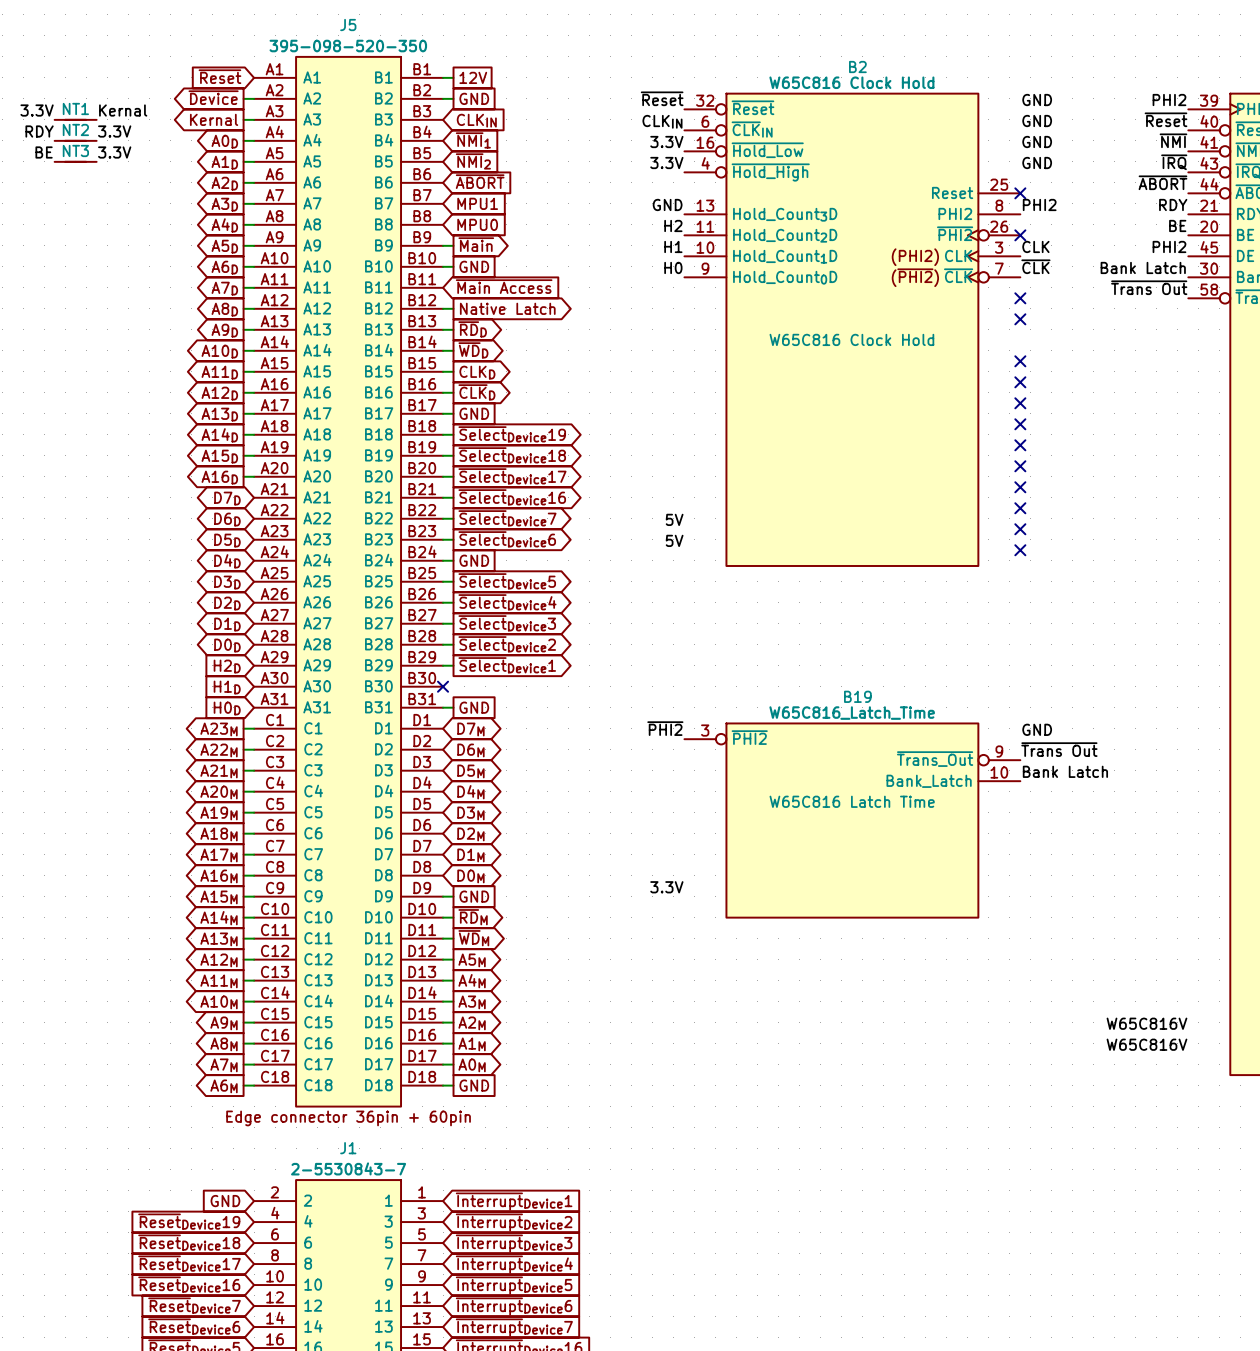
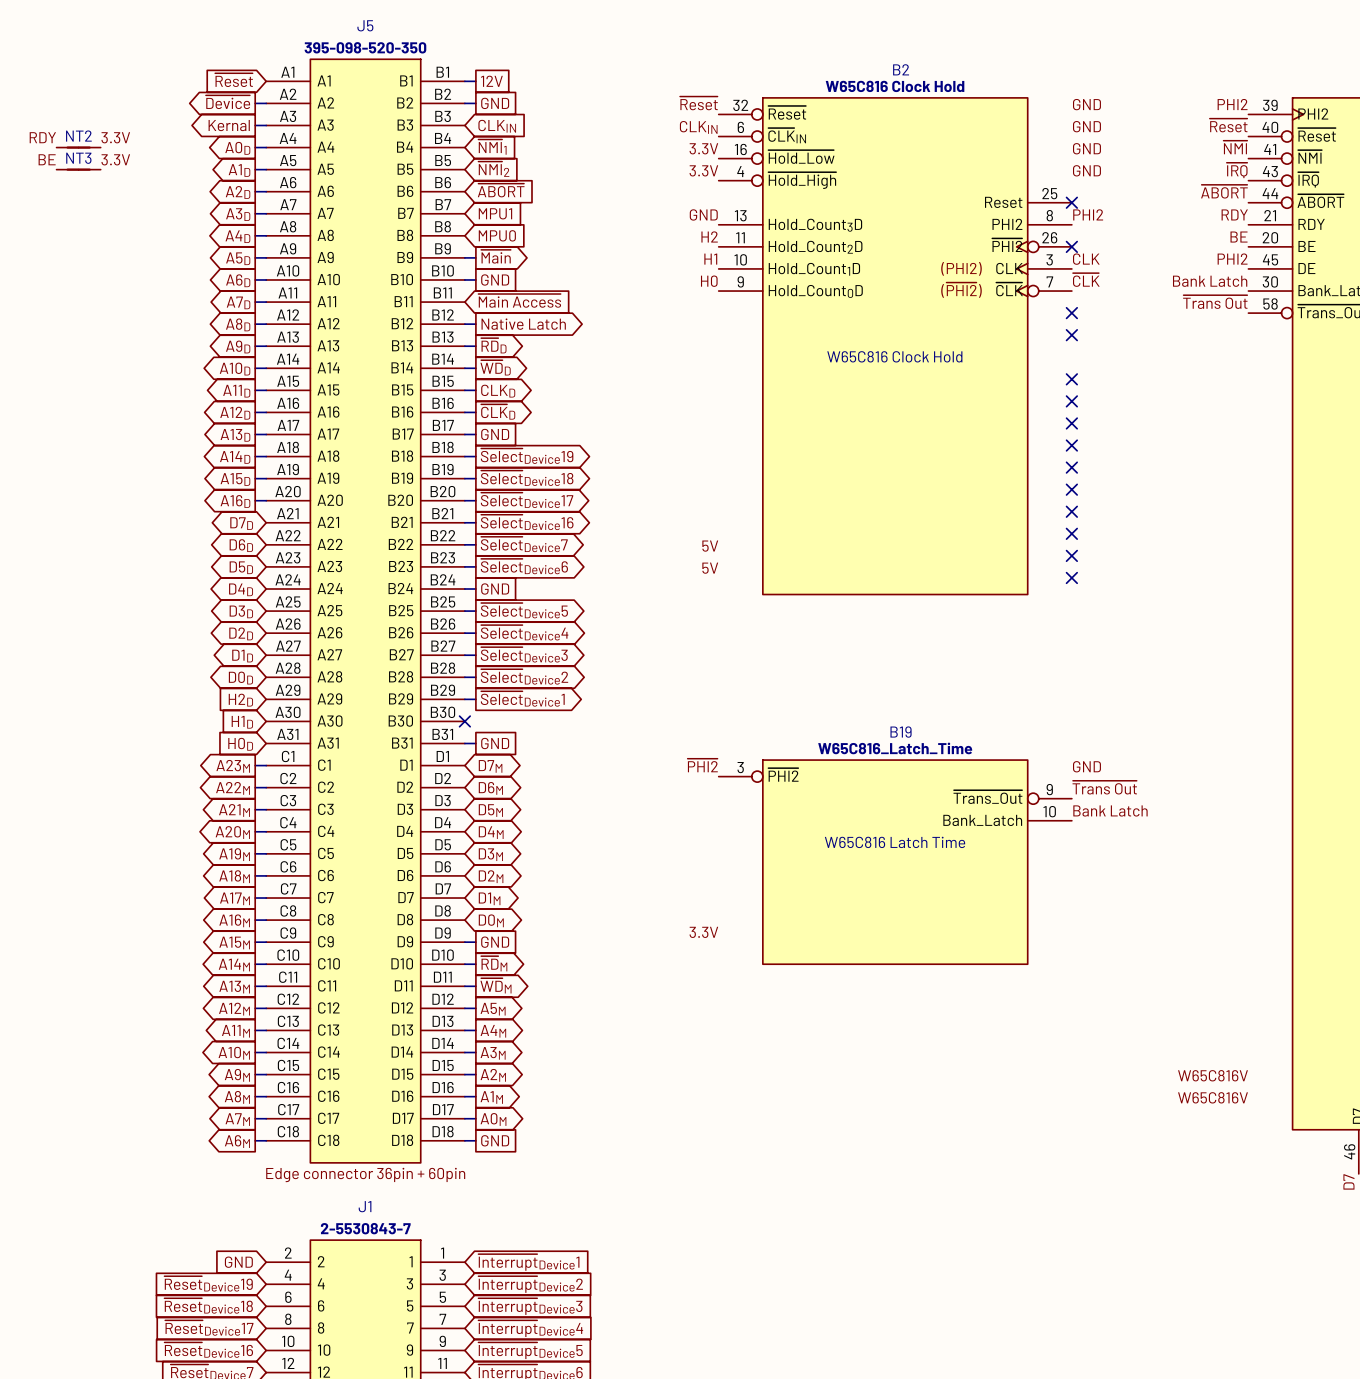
label: 3.3V (37, 110) -> none
label: Kernal (123, 110) -> none
NT1: (75, 119) -> none

